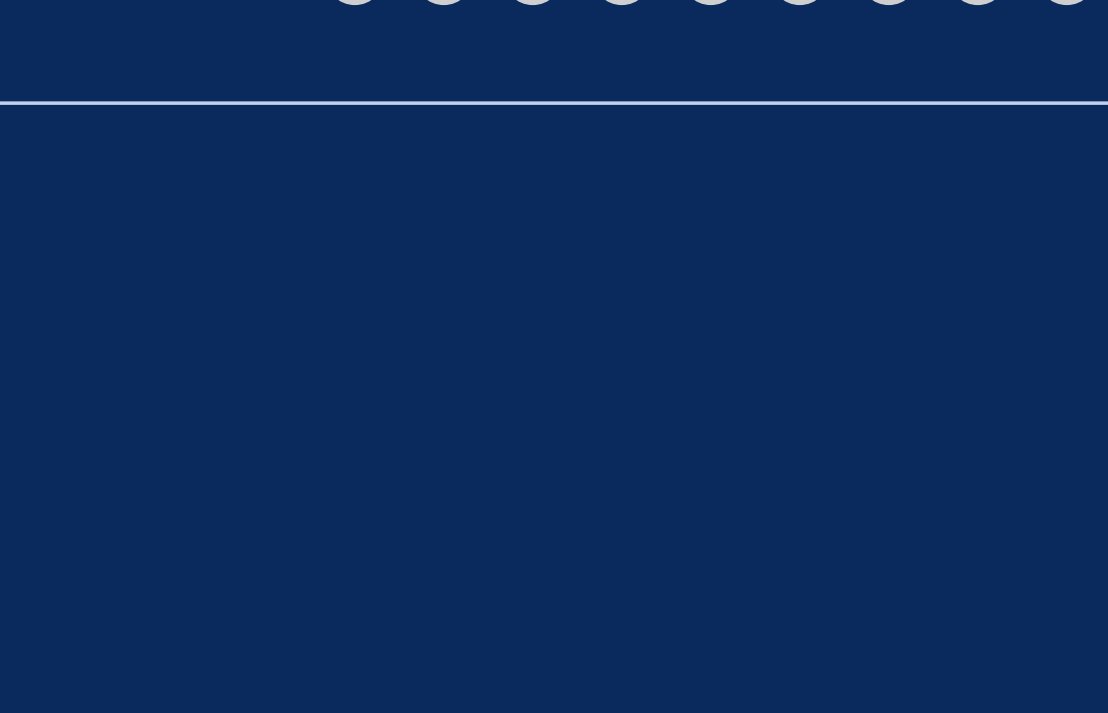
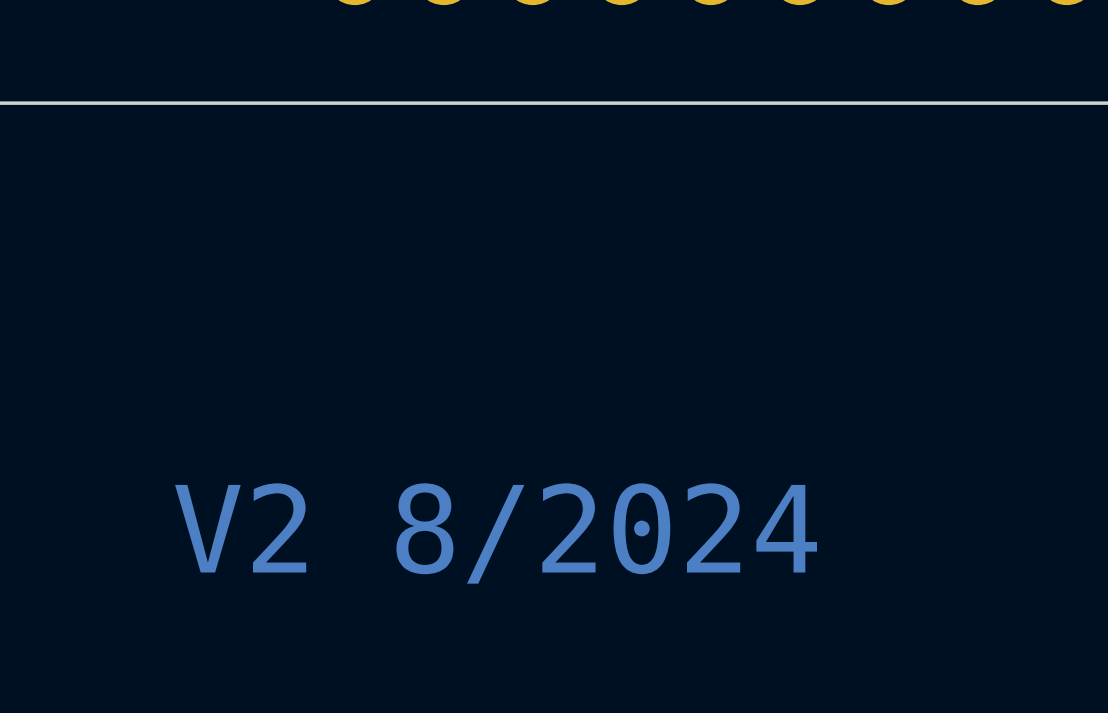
text: none -> V2 8/2024 (496, 533)

